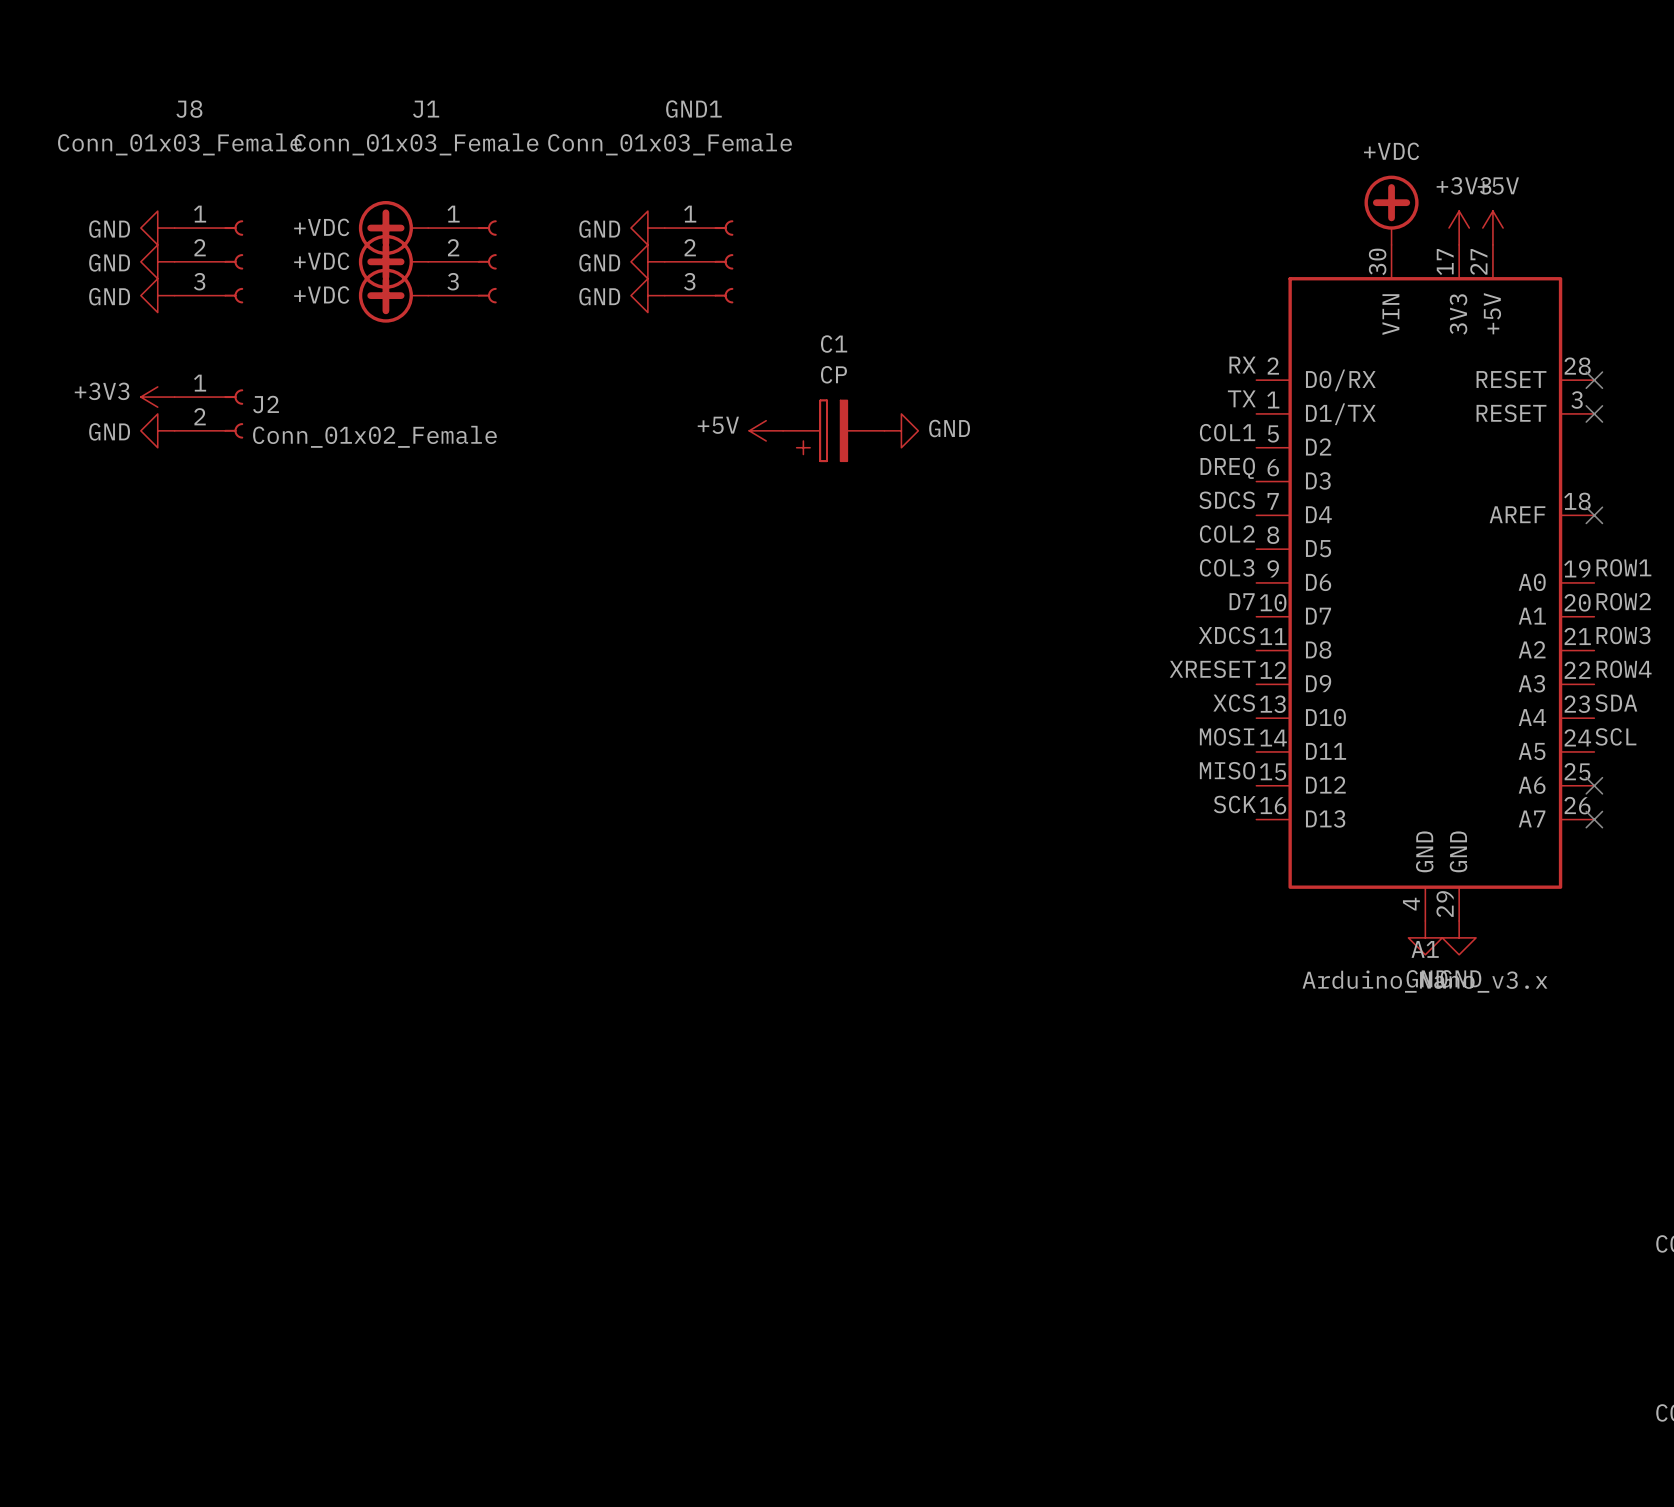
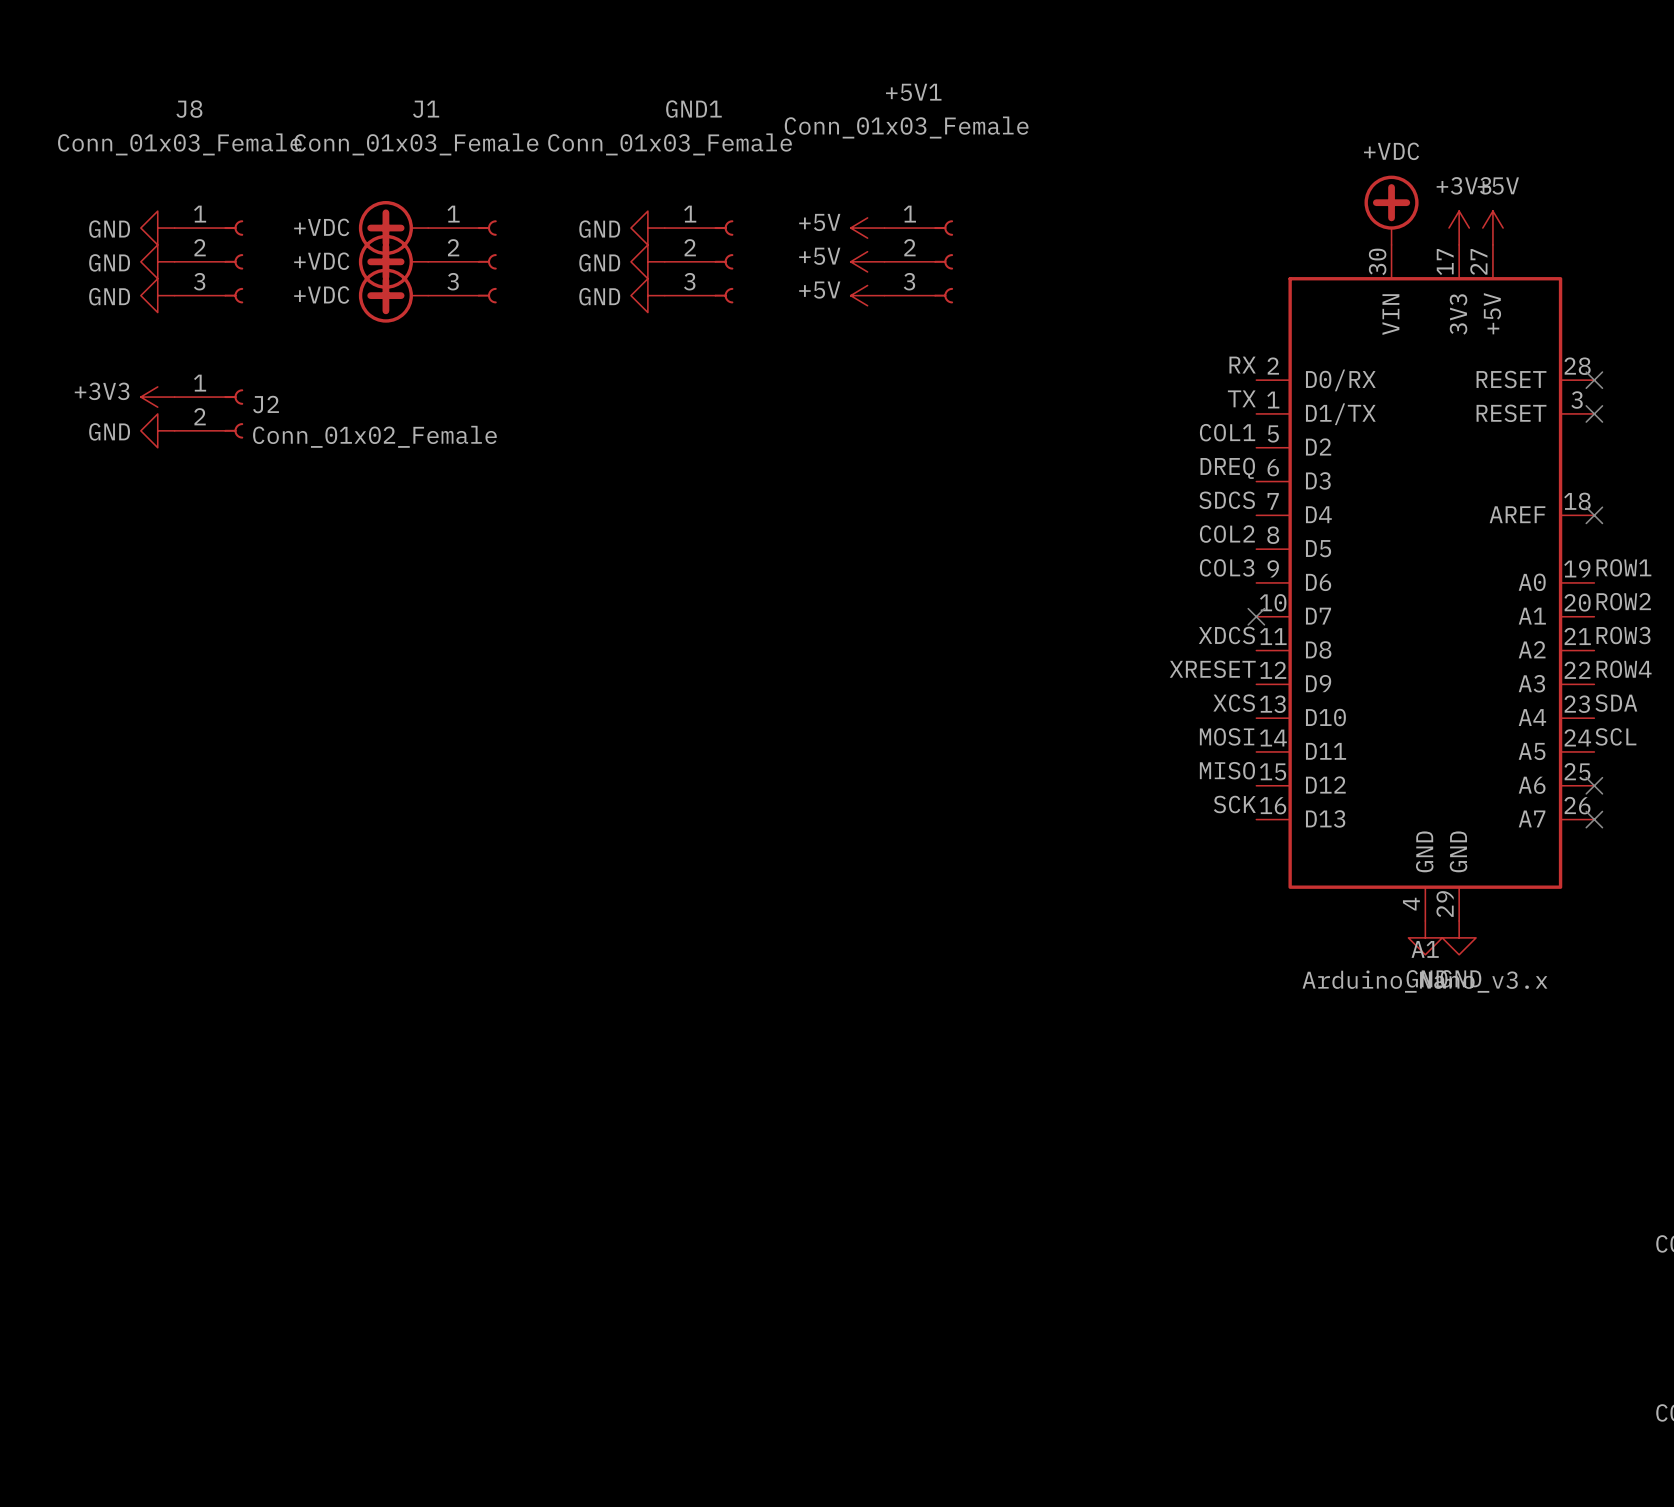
power symbol: none -> +5V (867, 228)
power symbol: none -> +5V (867, 261)
+5V1: none -> Conn_01x03_Female (918, 261)
power symbol: none -> +5V (867, 295)
power symbol: +5V (766, 430) -> none
C1: CP (833, 430) -> none
power symbol: GND (901, 430) -> none
label: D7 (1242, 601) -> none
no-connect mark: none -> (1256, 616)

